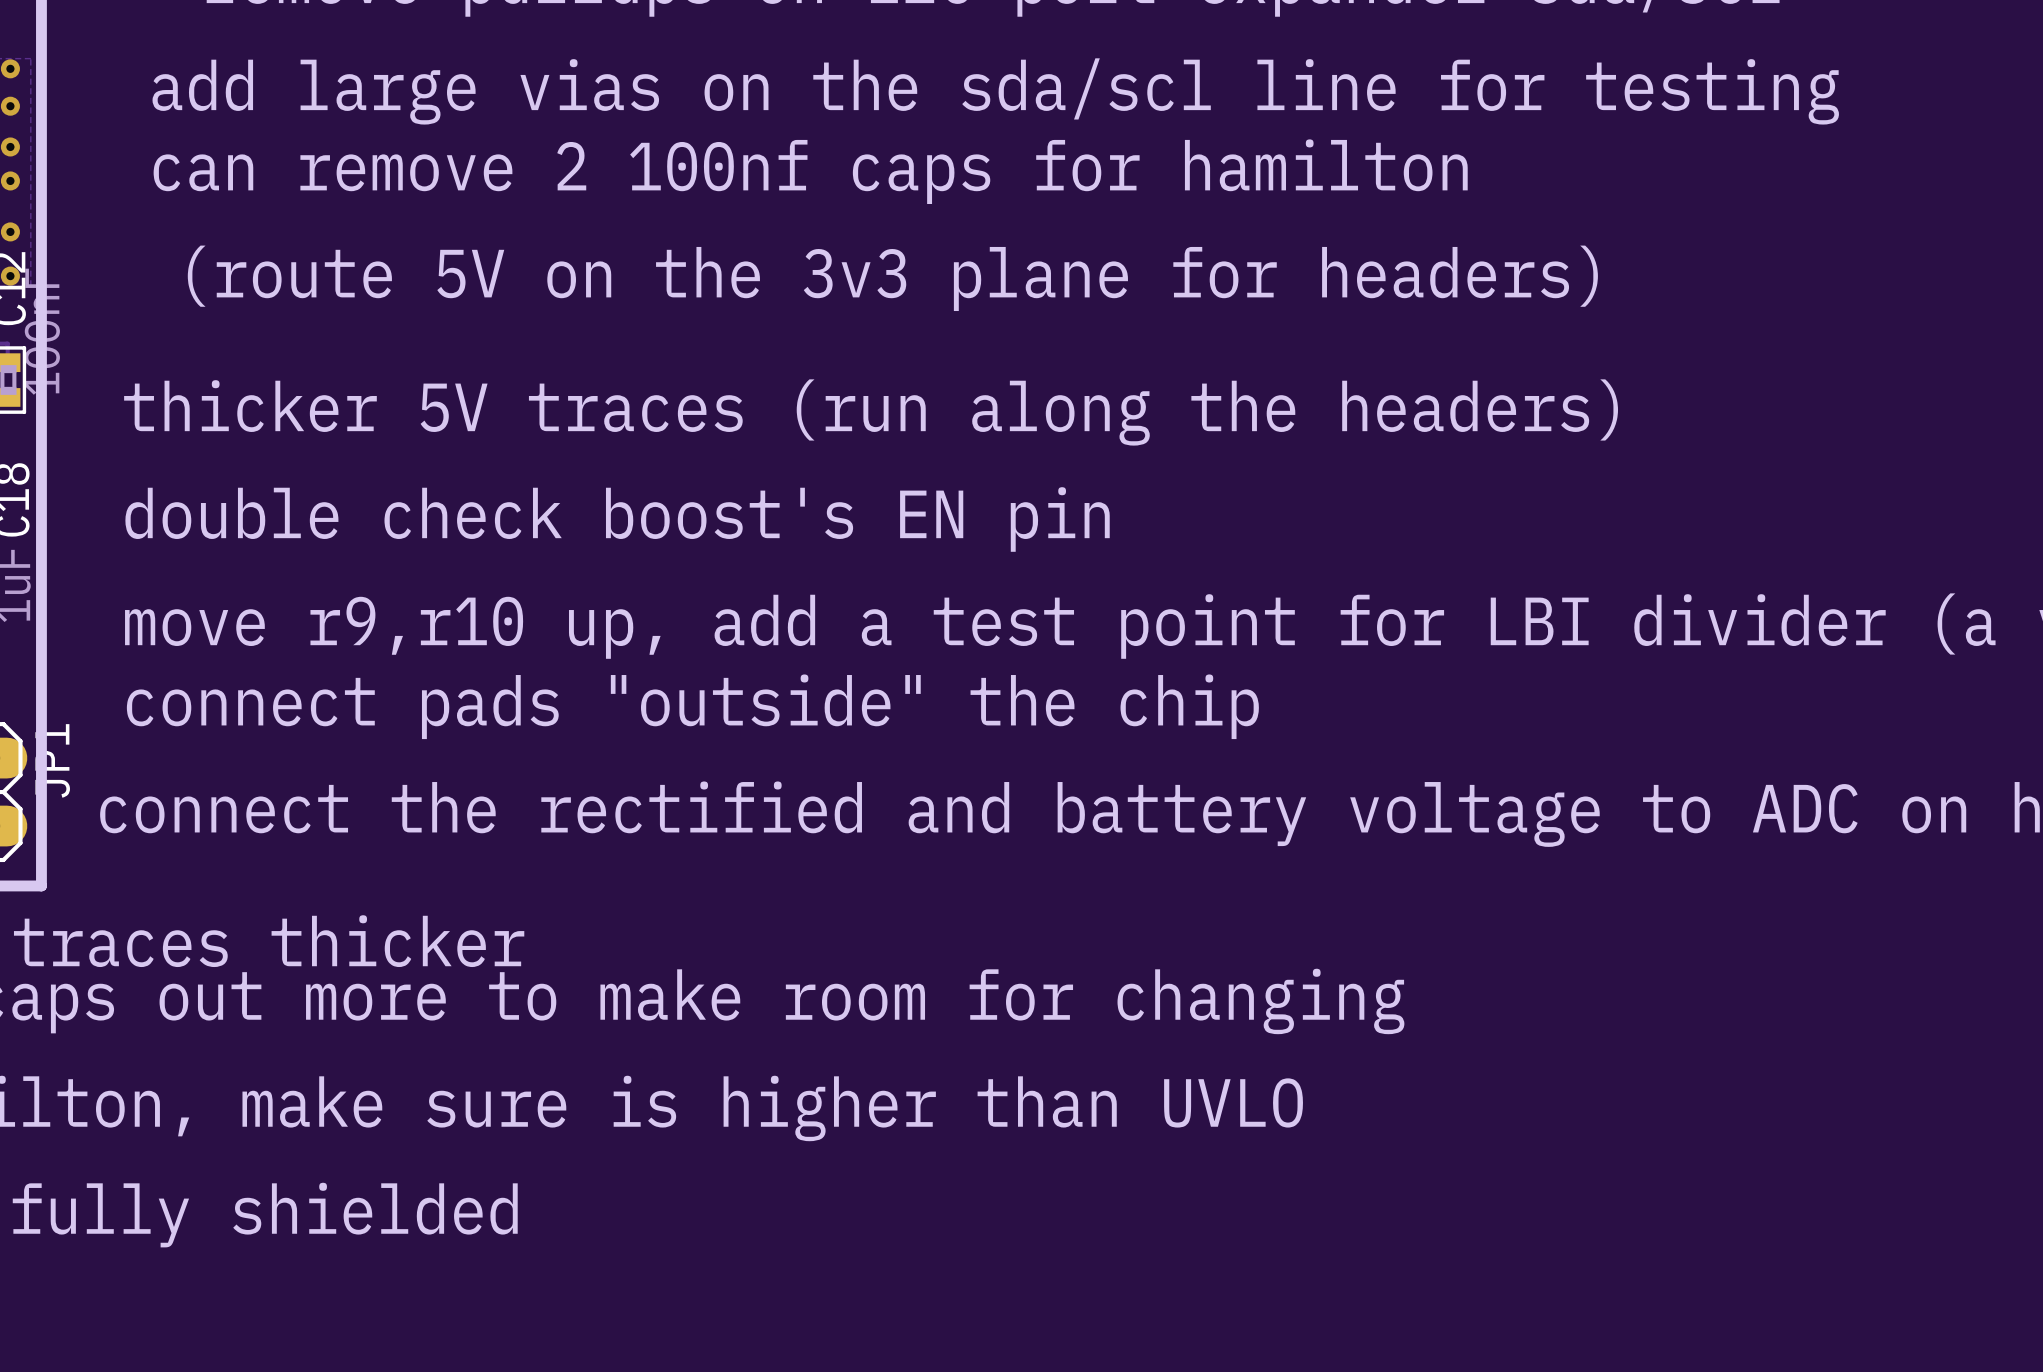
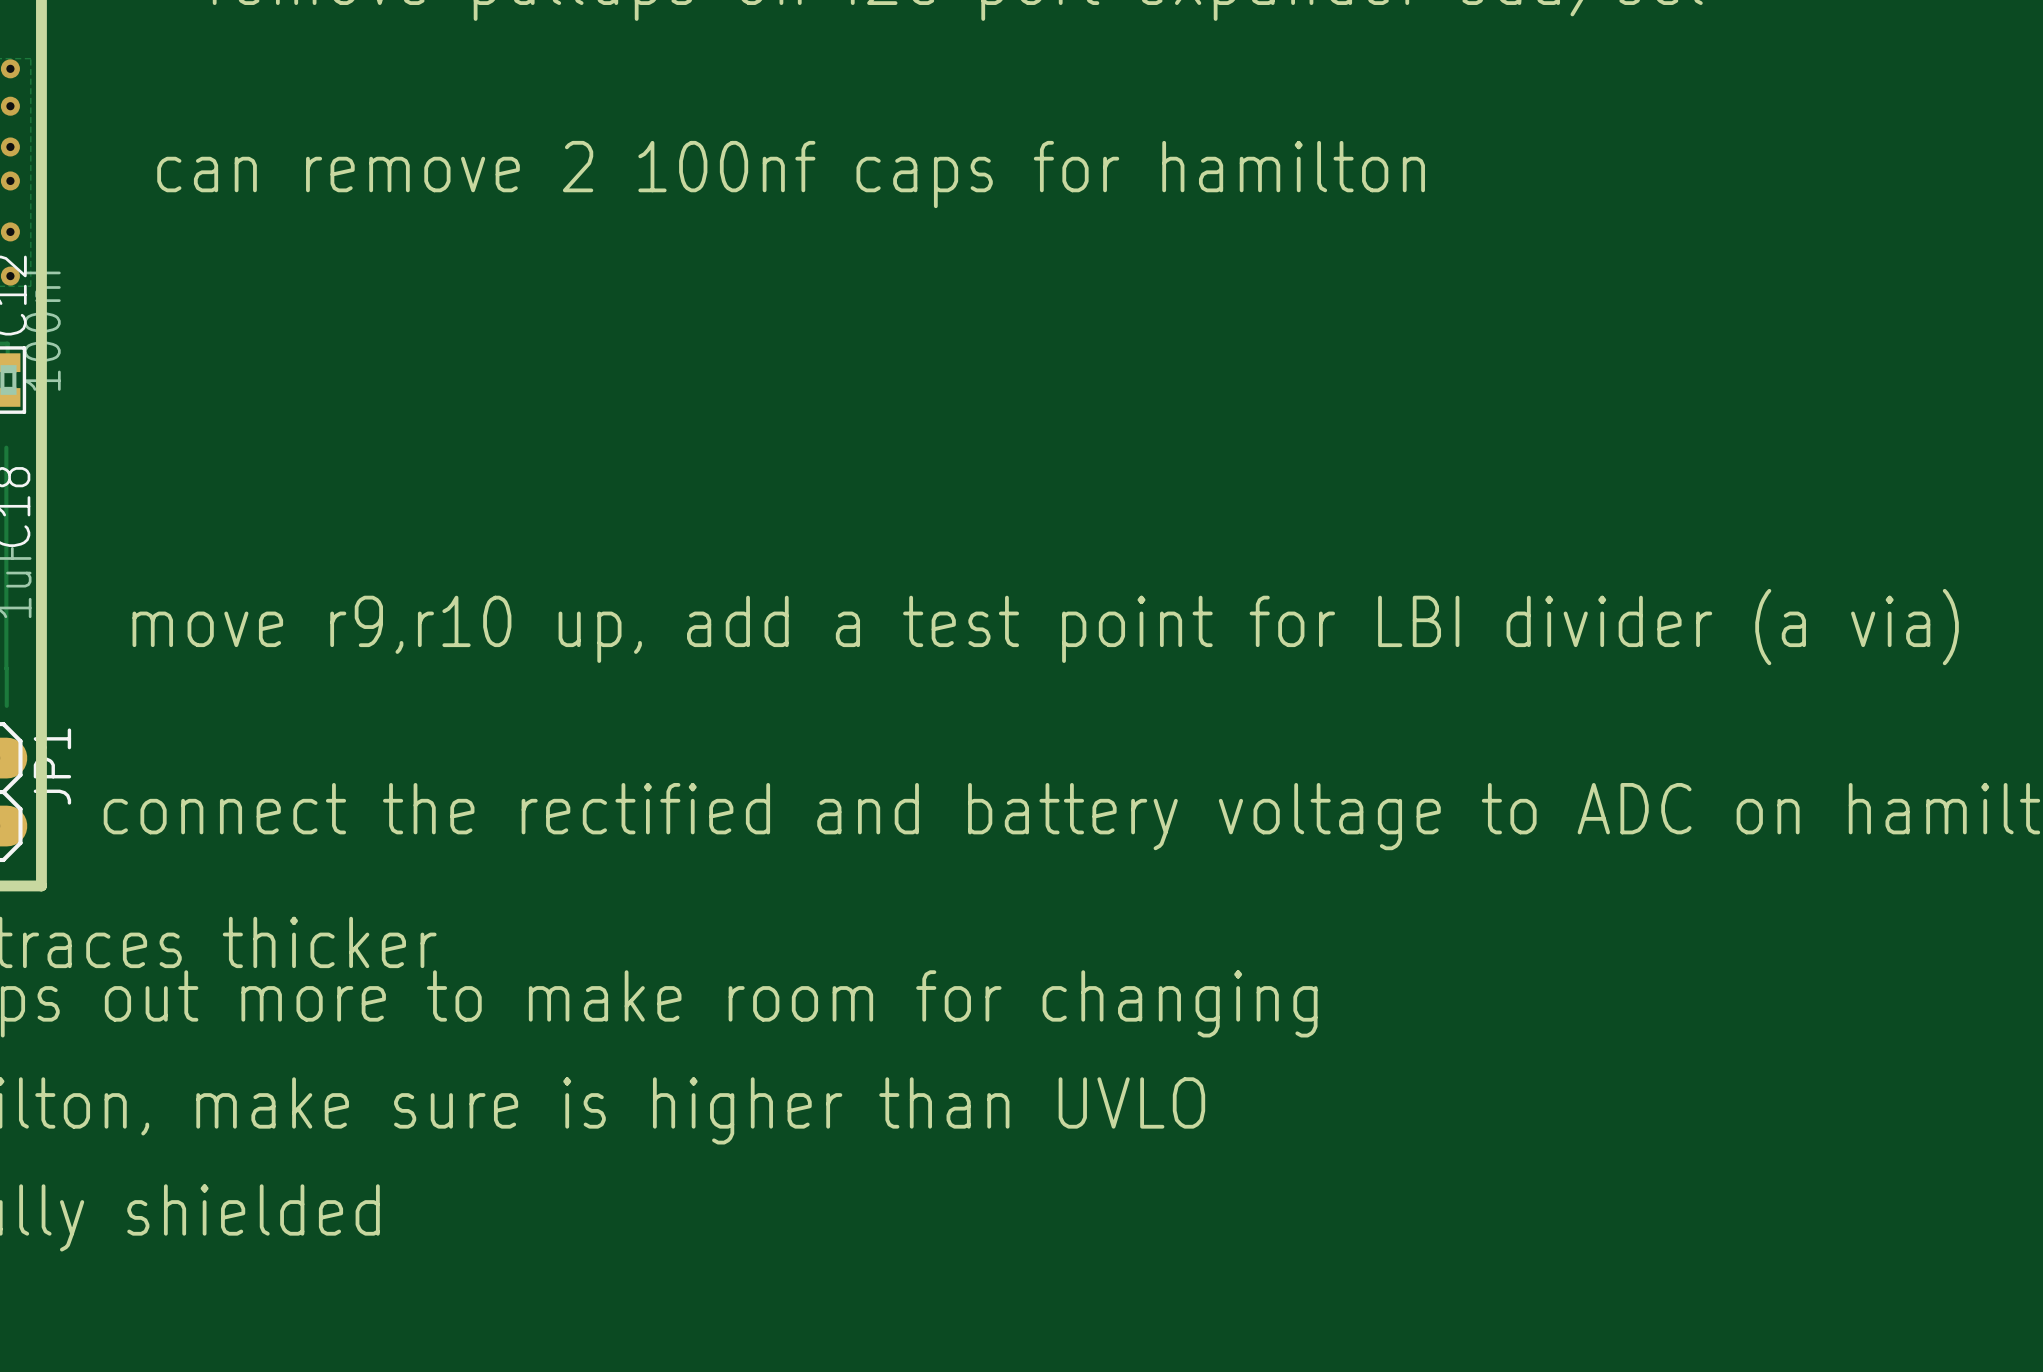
text: add large vias on the sda/scl line for testing (995, 91) -> none
text: (route 5V on the 3v3 plane for headers) (892, 278) -> none
text: thicker 5V traces (run along the headers) (871, 412) -> none
track: none -> (6, 447) (6, 668)
text: double check boost's EN pin (617, 519) -> none
track: none -> (6, 668) (6, 705)
text: connect pads "outside" the chip (692, 706) -> none

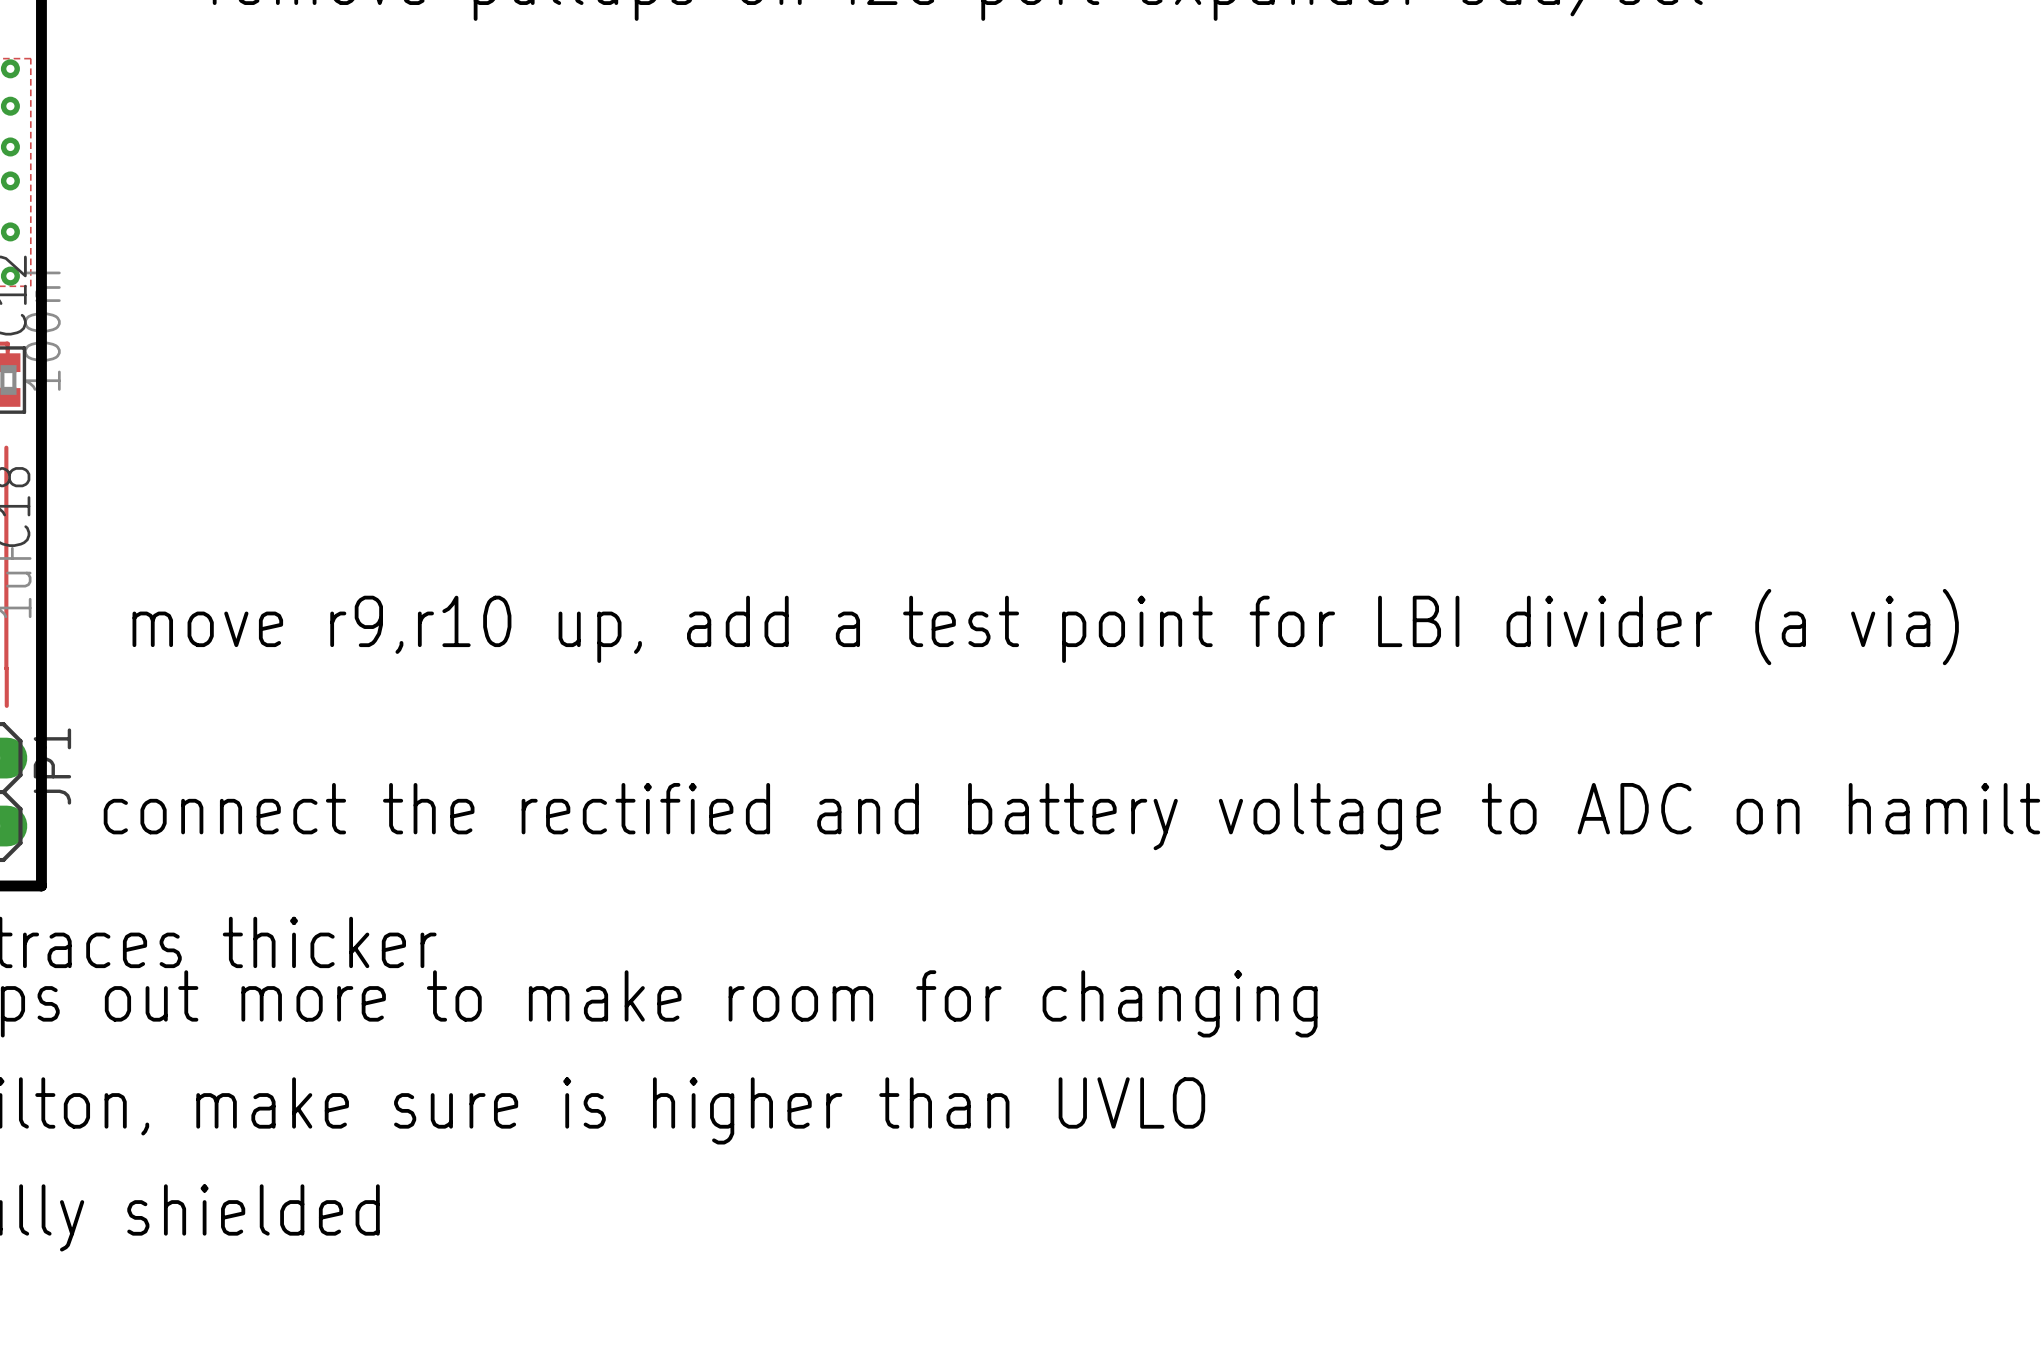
text: can remove 2 100nf caps for hamilton (791, 174) -> none

